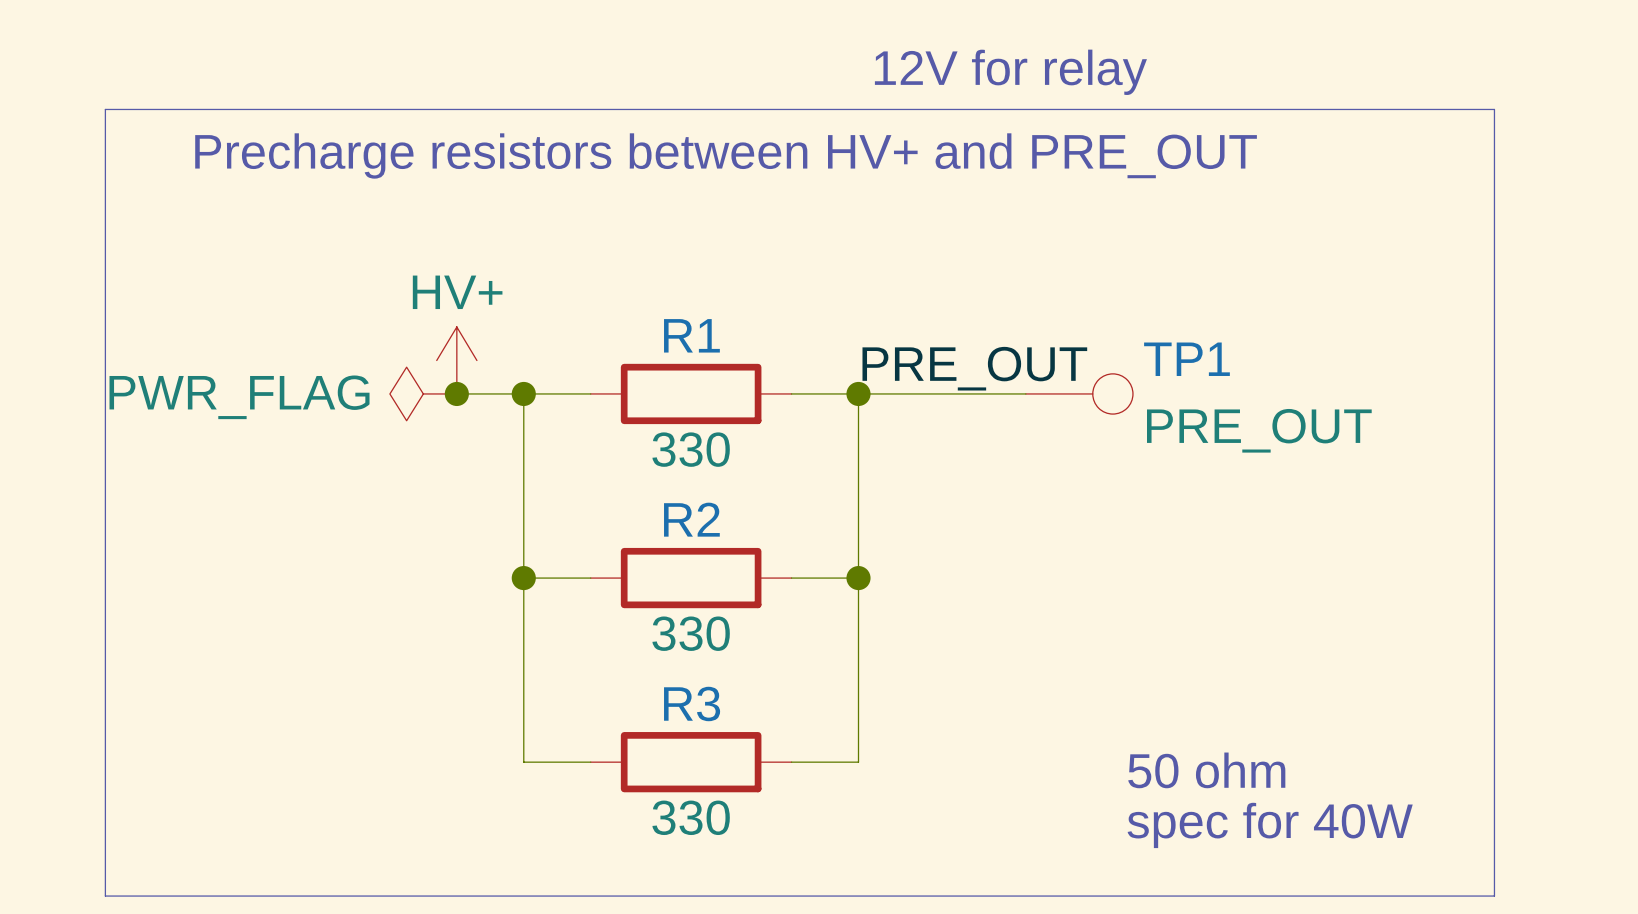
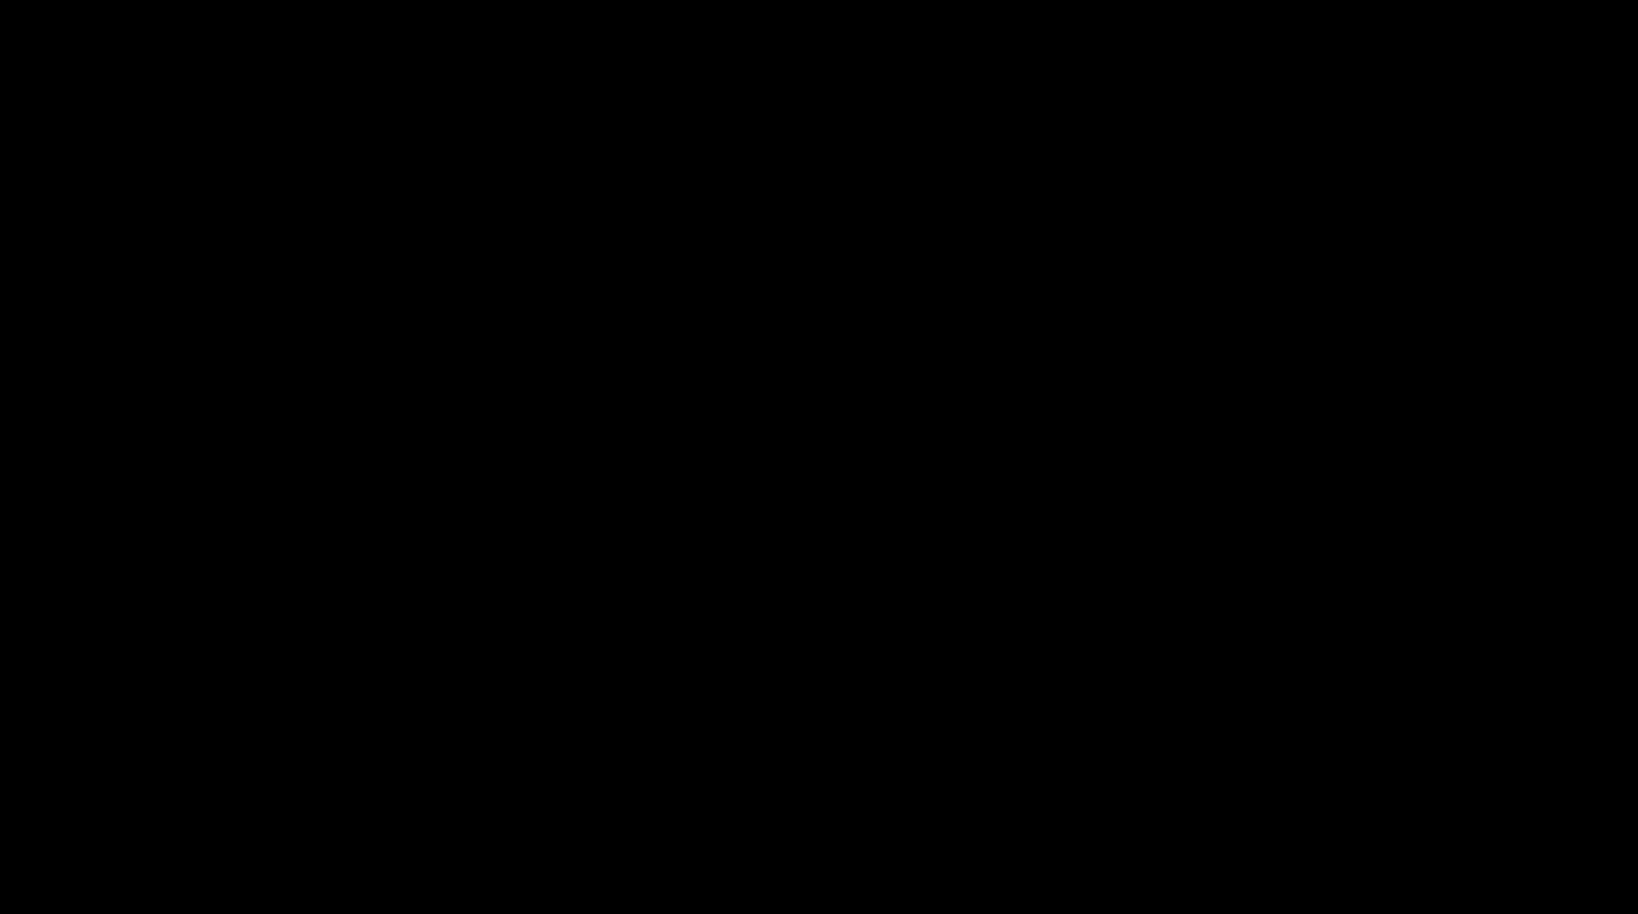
text: 12V for relay (1010, 72) -> none
line: (105, 109) (1494, 109) (1494, 896) (105, 896) (105, 109) -> none
text: Precharge resistors between HV+ and PRE_OUT (726, 155) -> none
power symbol: HV+ (456, 360) -> none
label: PRE_OUT (974, 368) -> none
power symbol: PWR_FLAG (423, 393) -> none
wire: (456, 393) (590, 393) -> none
junction: (456, 393) -> none
wire: (523, 393) (523, 762) (590, 762) -> none
junction: (523, 393) -> none
R1: 330 (691, 393) -> none
wire: (791, 393) (1025, 393) -> none
wire: (858, 393) (858, 762) (791, 762) -> none
junction: (858, 393) -> none
TP1: PRE_OUT (1079, 393) -> none
wire: (523, 578) (590, 578) -> none
junction: (523, 578) -> none
R2: 330 (691, 578) -> none
wire: (791, 578) (858, 578) -> none
junction: (858, 578) -> none
R3: 330 (691, 762) -> none
text: 50 ohm (1206, 770) -> none
text: spec for 40W (1270, 825) -> none

